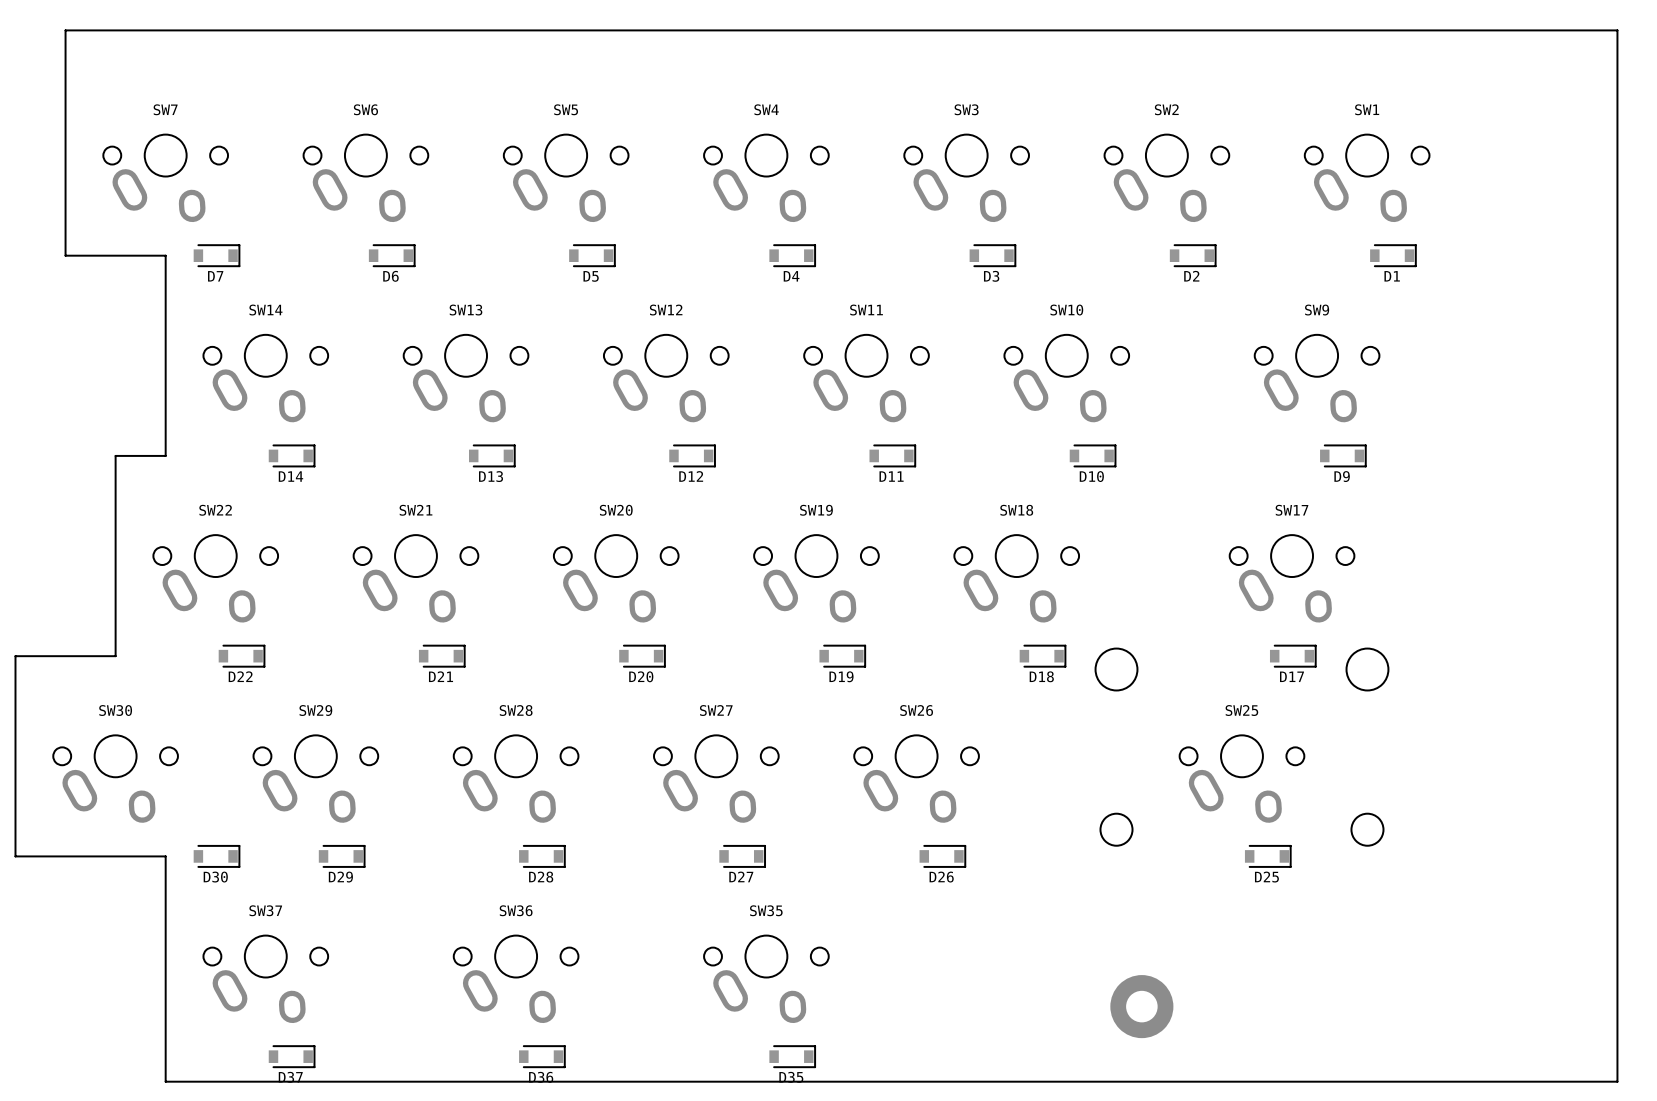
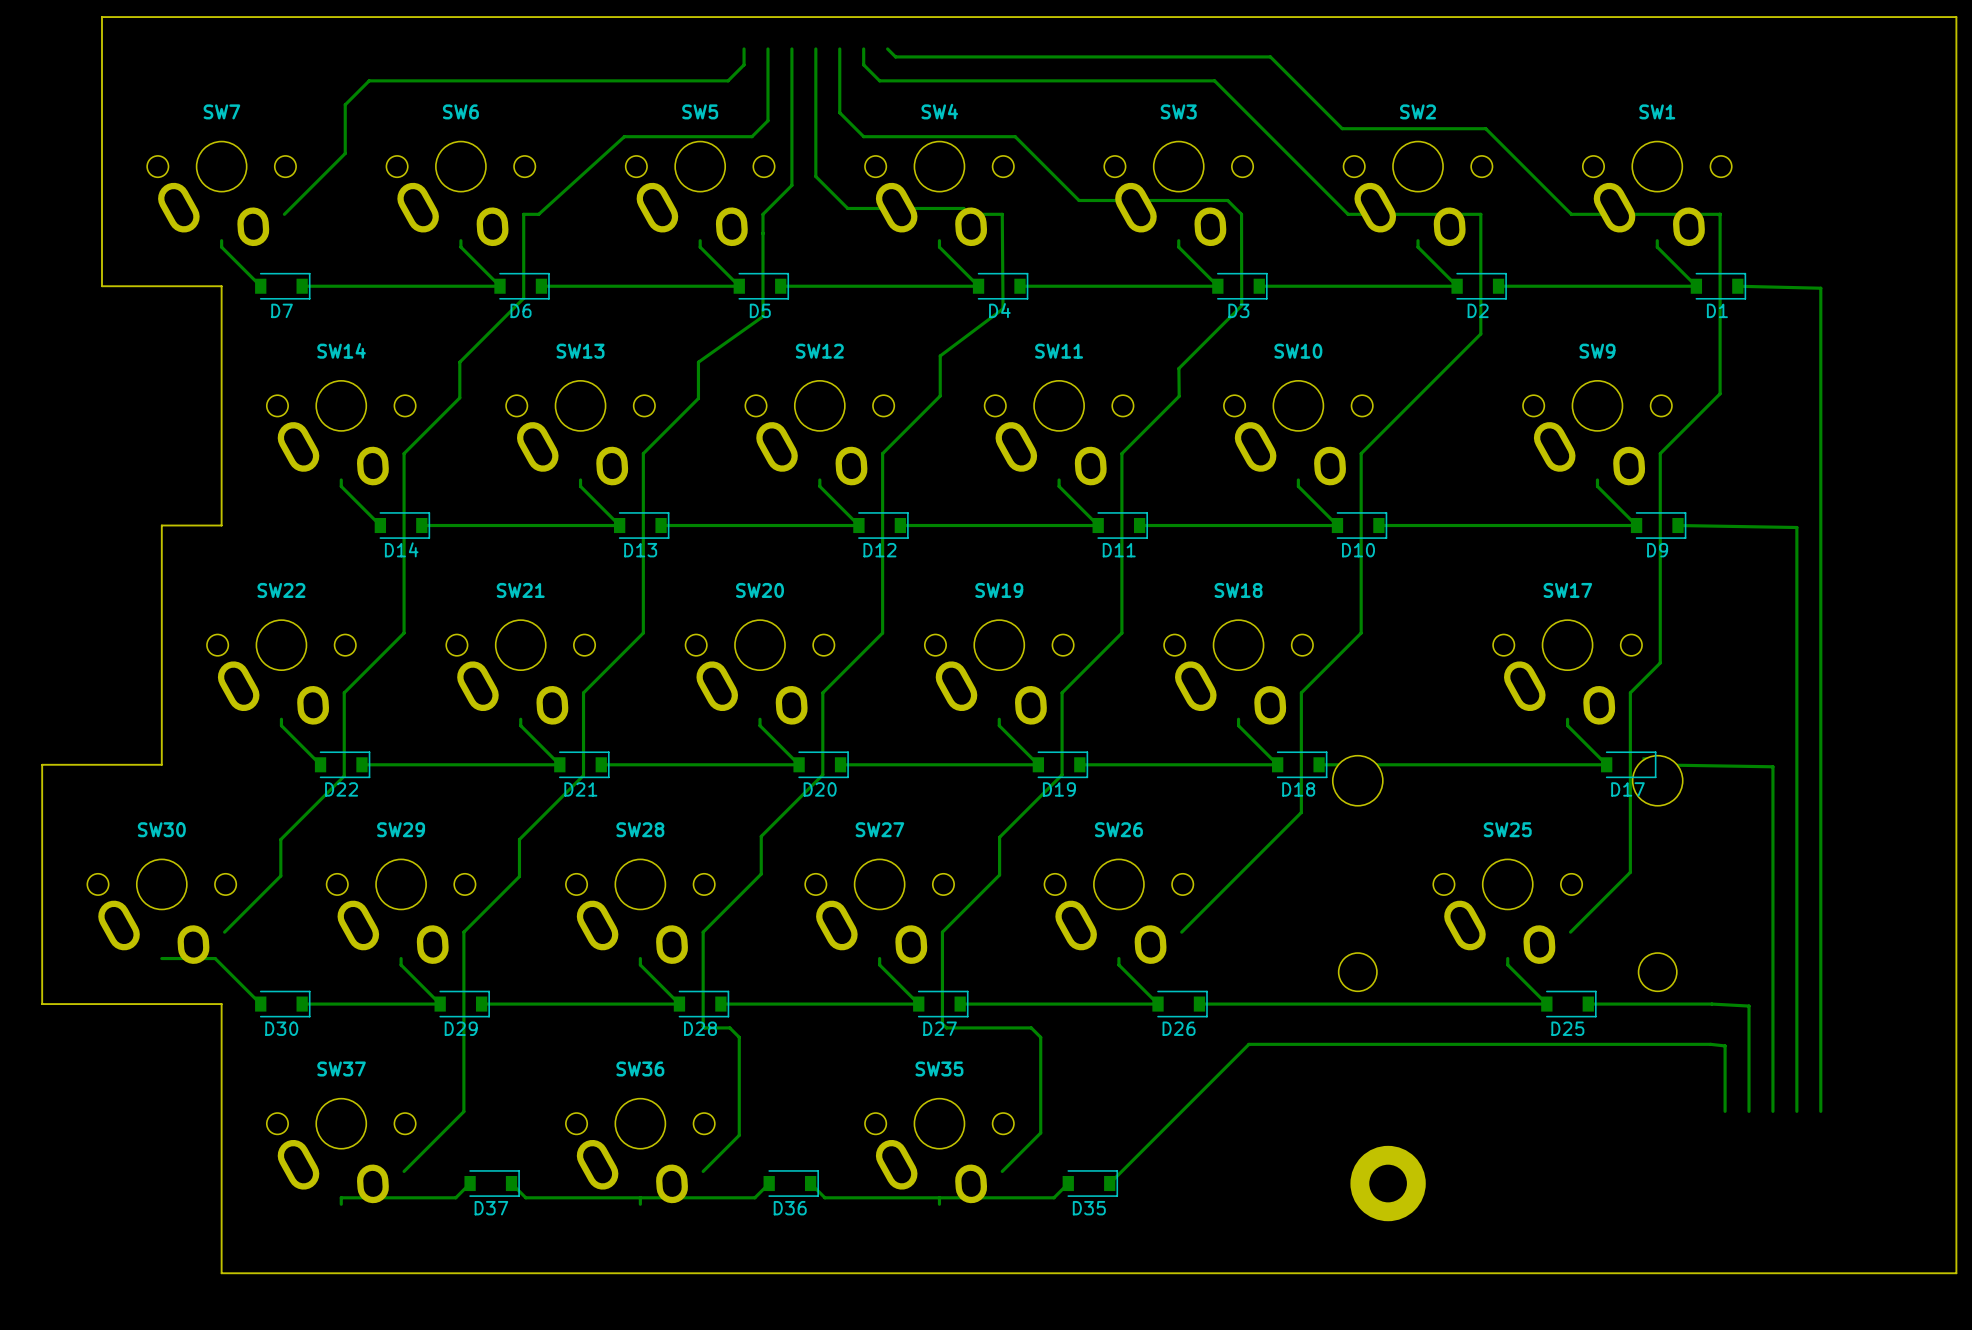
track: none -> (744, 48) (744, 64) (728, 80) (369, 80) (345, 104) (345, 153) (284, 214)
track: none -> (767, 48) (767, 120) (752, 136) (624, 136) (538, 214) (523, 214) (523, 298) (459, 362) (459, 397) (404, 453) (404, 633) (344, 692) (344, 776) (280, 839) (280, 875) (224, 932)
track: none -> (791, 48) (791, 185) (762, 214) (762, 316) (698, 362) (698, 398) (643, 453) (643, 633) (583, 692) (583, 775) (519, 839) (519, 876) (463, 932) (463, 1111) (404, 1171)
track: none -> (815, 48) (815, 176) (847, 208) (963, 208) (969, 214) (1002, 214) (1003, 308) (940, 355) (940, 395) (882, 453) (882, 633) (822, 692) (822, 774) (761, 836) (761, 874) (703, 932) (703, 1026) (729, 1027) (739, 1037) (739, 1135) (703, 1171)
track: none -> (839, 48) (839, 112) (863, 136) (1015, 136) (1079, 200) (1227, 200) (1241, 214) (1241, 305) (1178, 368) (1179, 396) (1121, 453) (1121, 633) (1062, 692) (1062, 774) (999, 837) (999, 875) (942, 932) (942, 1023) (946, 1027) (1031, 1027) (1040, 1037) (1040, 1132) (1002, 1171)
track: none -> (863, 48) (863, 64) (879, 80) (1214, 80) (1348, 214) (1480, 214) (1480, 333) (1361, 453) (1361, 633) (1301, 692) (1301, 812) (1181, 932)
track: none -> (887, 48) (895, 56) (1270, 56) (1342, 128) (1485, 128) (1571, 214) (1720, 214) (1720, 393) (1660, 453) (1660, 662) (1630, 692) (1630, 872) (1570, 932)
track: none -> (221, 240) (221, 247) (260, 286)
track: none -> (460, 240) (460, 247) (500, 286) (302, 286)
track: none -> (700, 240) (700, 247) (739, 286) (541, 286)
track: none -> (939, 240) (939, 247) (978, 286) (780, 286)
track: none -> (1178, 240) (1178, 247) (1217, 286) (1020, 286)
track: none -> (1418, 240) (1418, 247) (1457, 286) (1259, 286)
track: none -> (1657, 240) (1657, 247) (1696, 286) (1498, 286)
D6 position: (392, 255) -> (522, 286)
D5 position: (592, 255) -> (761, 286)
D4 position: (792, 255) -> (1000, 286)
D3 position: (992, 255) -> (1239, 286)
D2 position: (1193, 255) -> (1479, 286)
D1 position: (1393, 255) -> (1718, 286)
track: none -> (1737, 286) (1820, 288) (1820, 1111)
track: none -> (341, 479) (341, 486) (380, 525)
track: none -> (580, 479) (580, 486) (619, 525) (421, 525)
track: none -> (819, 479) (819, 486) (858, 525) (661, 525)
track: none -> (1059, 479) (1059, 486) (1098, 525) (900, 525)
track: none -> (1298, 479) (1298, 486) (1337, 525) (1139, 525)
track: none -> (1597, 479) (1597, 486) (1636, 525) (1378, 525)
D14 position: (291, 455) -> (402, 525)
D13 position: (492, 455) -> (641, 525)
D12 position: (692, 455) -> (880, 525)
D11 position: (892, 455) -> (1120, 525)
D10 position: (1092, 455) -> (1359, 525)
D9 position: (1343, 455) -> (1658, 525)
track: none -> (1678, 525) (1796, 527) (1796, 1111)
track: none -> (281, 719) (281, 725) (320, 764)
track: none -> (520, 719) (520, 725) (559, 764) (361, 764)
track: none -> (760, 719) (760, 725) (799, 764) (601, 764)
track: none -> (999, 719) (999, 725) (1038, 764) (840, 764)
track: none -> (1238, 719) (1238, 725) (1277, 764) (1079, 764)
track: none -> (1567, 719) (1567, 725) (1606, 764) (1319, 764)
D22 position: (241, 656) -> (342, 764)
D21 position: (442, 656) -> (581, 764)
D20 position: (642, 656) -> (821, 764)
D19 position: (842, 656) -> (1060, 764)
D18 position: (1042, 656) -> (1299, 764)
D17 position: (1293, 656) -> (1628, 764)
track: none -> (1648, 764) (1772, 766) (1772, 1111)
track: none -> (161, 958) (215, 958) (260, 1004)
track: none -> (401, 958) (401, 964) (440, 1004) (302, 1004)
track: none -> (640, 958) (640, 964) (679, 1004) (481, 1004)
track: none -> (879, 958) (879, 964) (918, 1004) (720, 1004)
track: none -> (1118, 958) (1118, 964) (1158, 1004) (960, 1004)
track: none -> (1507, 958) (1507, 964) (1546, 1004) (1199, 1004)
D29 position: (341, 856) -> (462, 1004)
D28 position: (542, 856) -> (701, 1004)
D27 position: (742, 856) -> (940, 1004)
D26 position: (942, 856) -> (1180, 1004)
D25 position: (1268, 856) -> (1568, 1004)
track: none -> (1588, 1004) (1711, 1004) (1749, 1006) (1749, 1111)
track: none -> (1725, 1111) (1725, 1045) (1710, 1044) (1248, 1044) (1109, 1183)
track: none -> (470, 1183) (455, 1197) (341, 1197) (341, 1204)
track: none -> (769, 1183) (754, 1197) (525, 1197) (511, 1183)
track: none -> (1068, 1183) (1053, 1197) (824, 1197) (810, 1183)
track: none -> (640, 1197) (640, 1204)
track: none -> (939, 1197) (939, 1204)
D37 position: (291, 1056) -> (492, 1183)
D36 position: (542, 1056) -> (791, 1183)
D35 position: (792, 1056) -> (1090, 1183)

